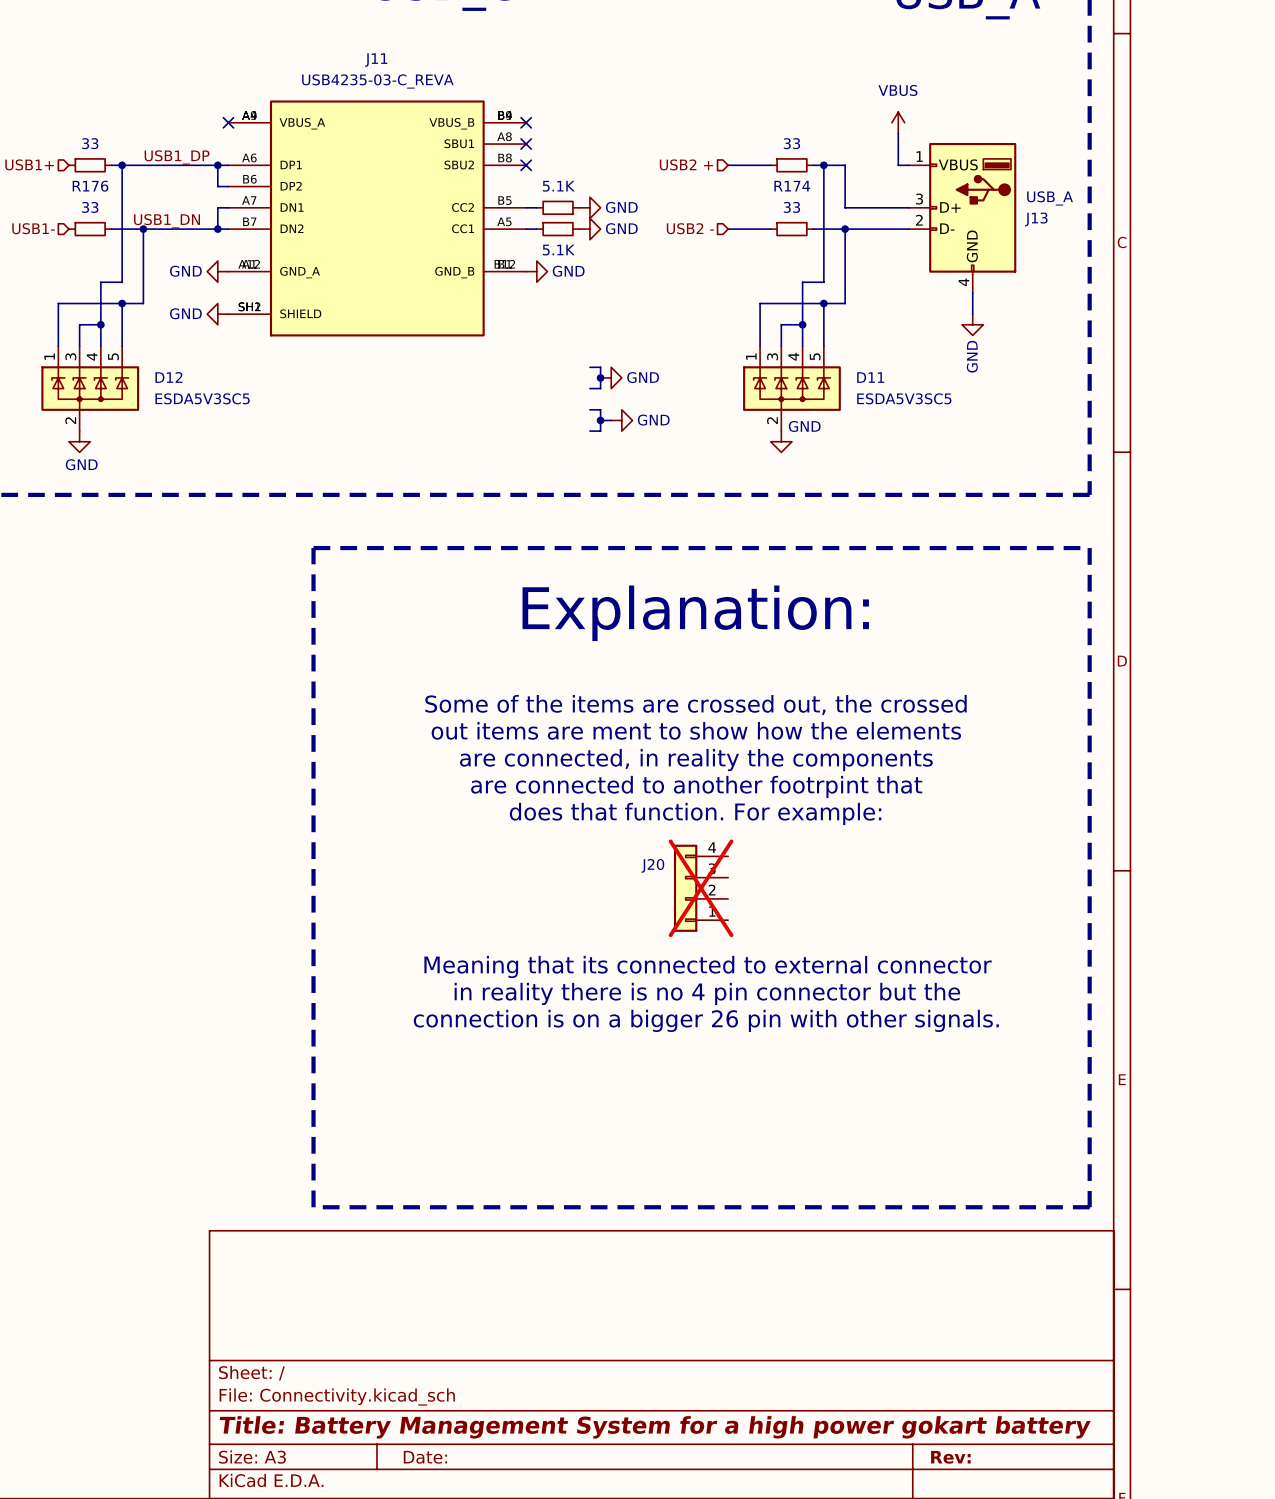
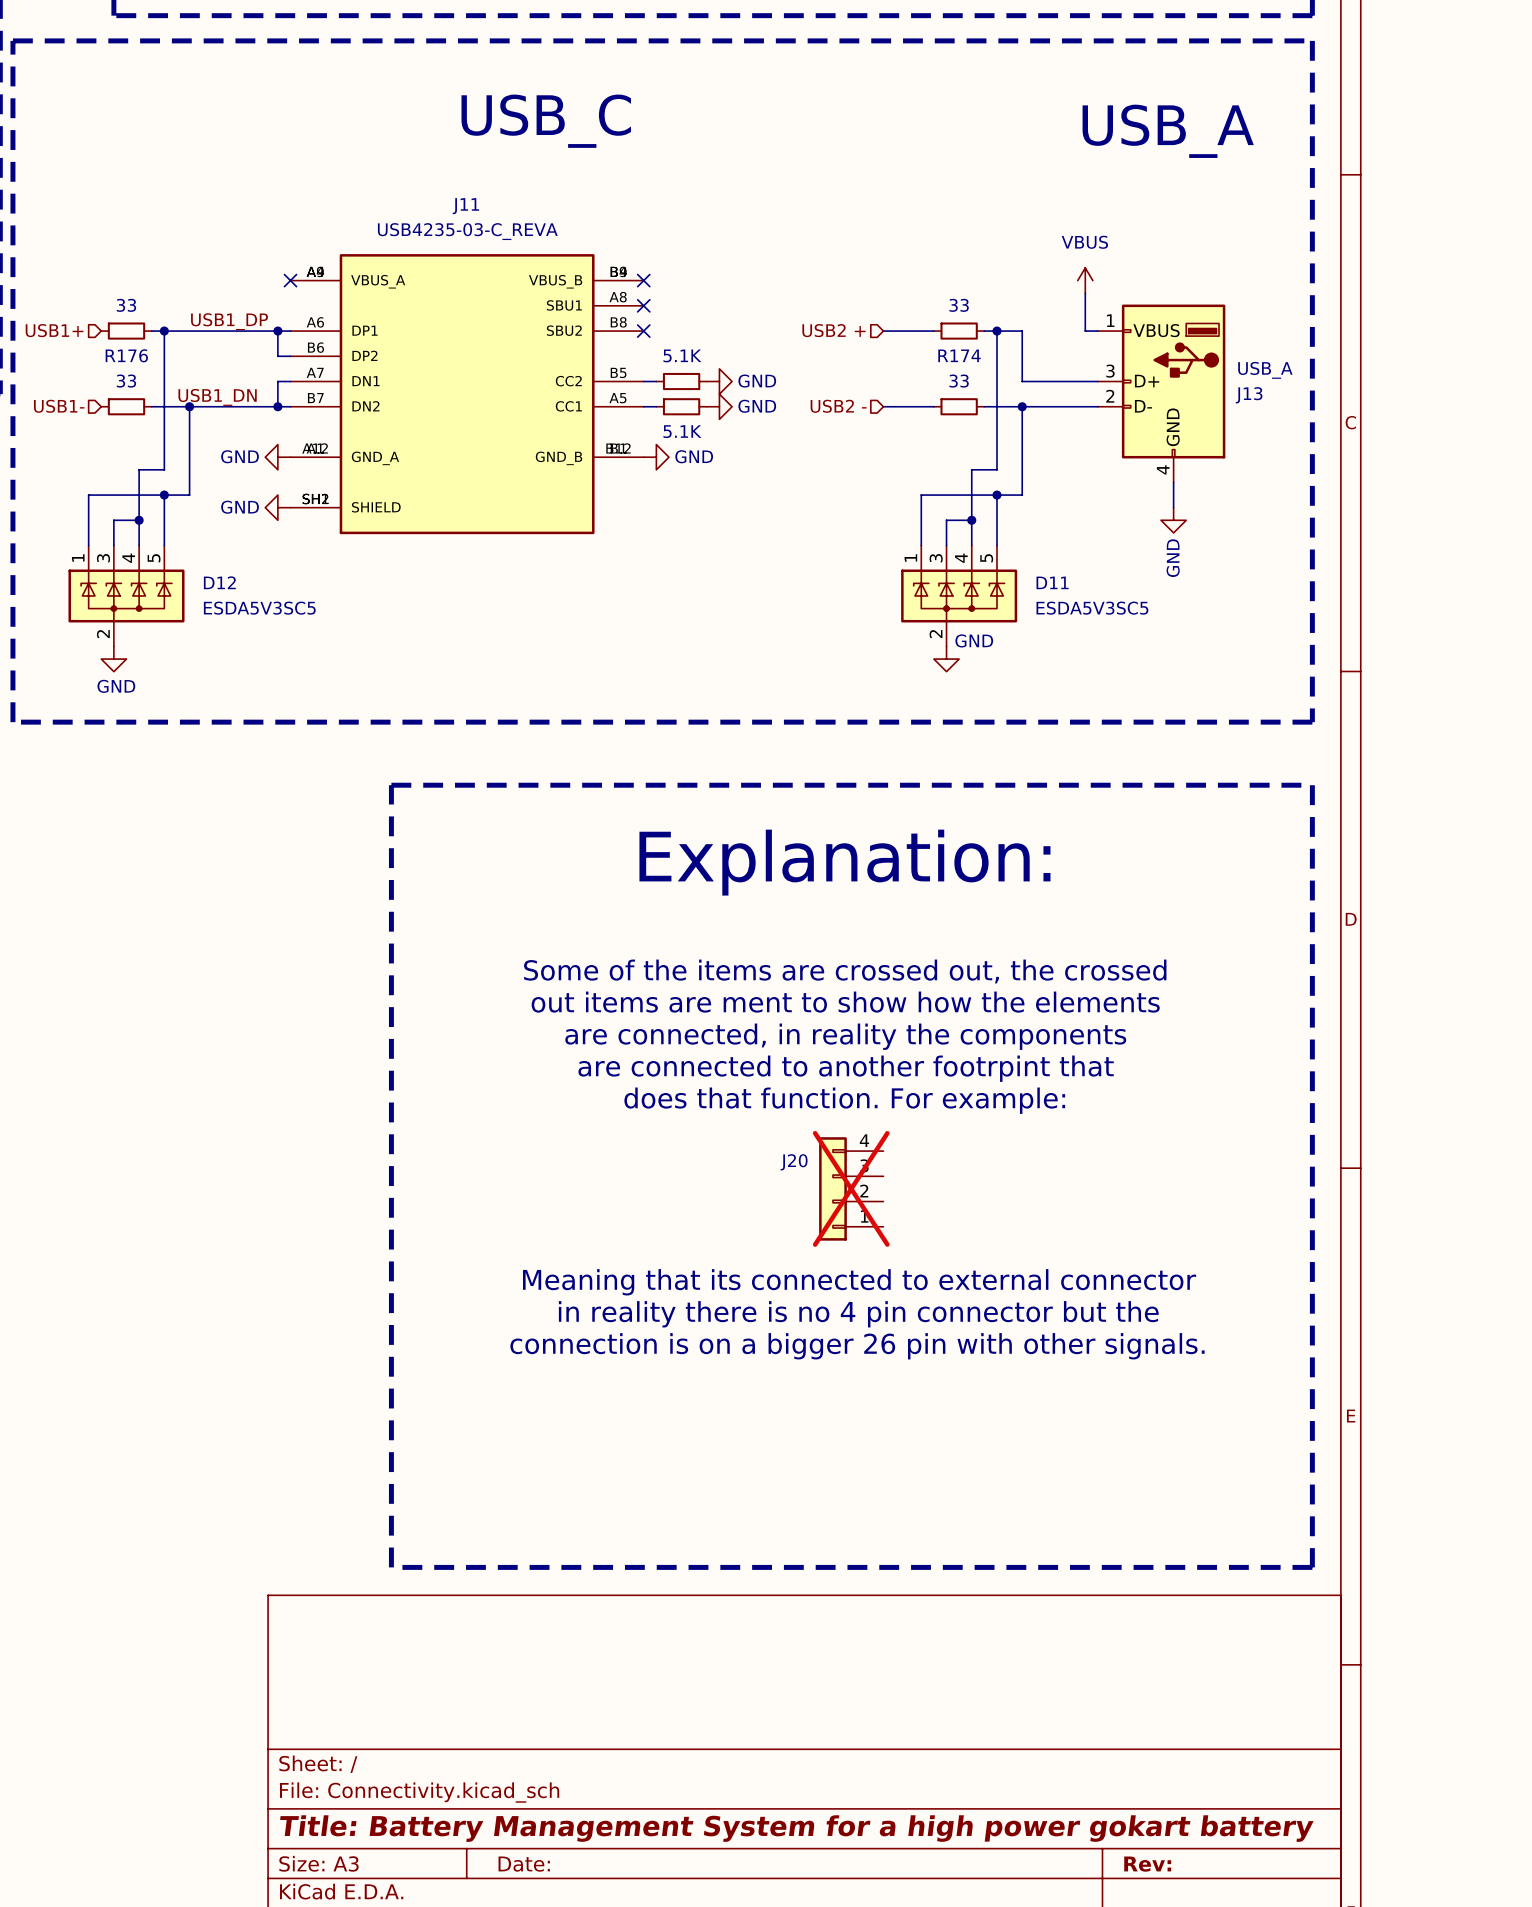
wire: (589, 367) (600, 367) (600, 388) (589, 388) -> none
junction: (600, 377) -> none
power symbol: GND (611, 377) -> none
wire: (589, 409) (600, 409) (600, 431) (589, 431) -> none
wire: (600, 420) (611, 420) -> none
junction: (600, 420) -> none
power symbol: GND (621, 420) -> none

